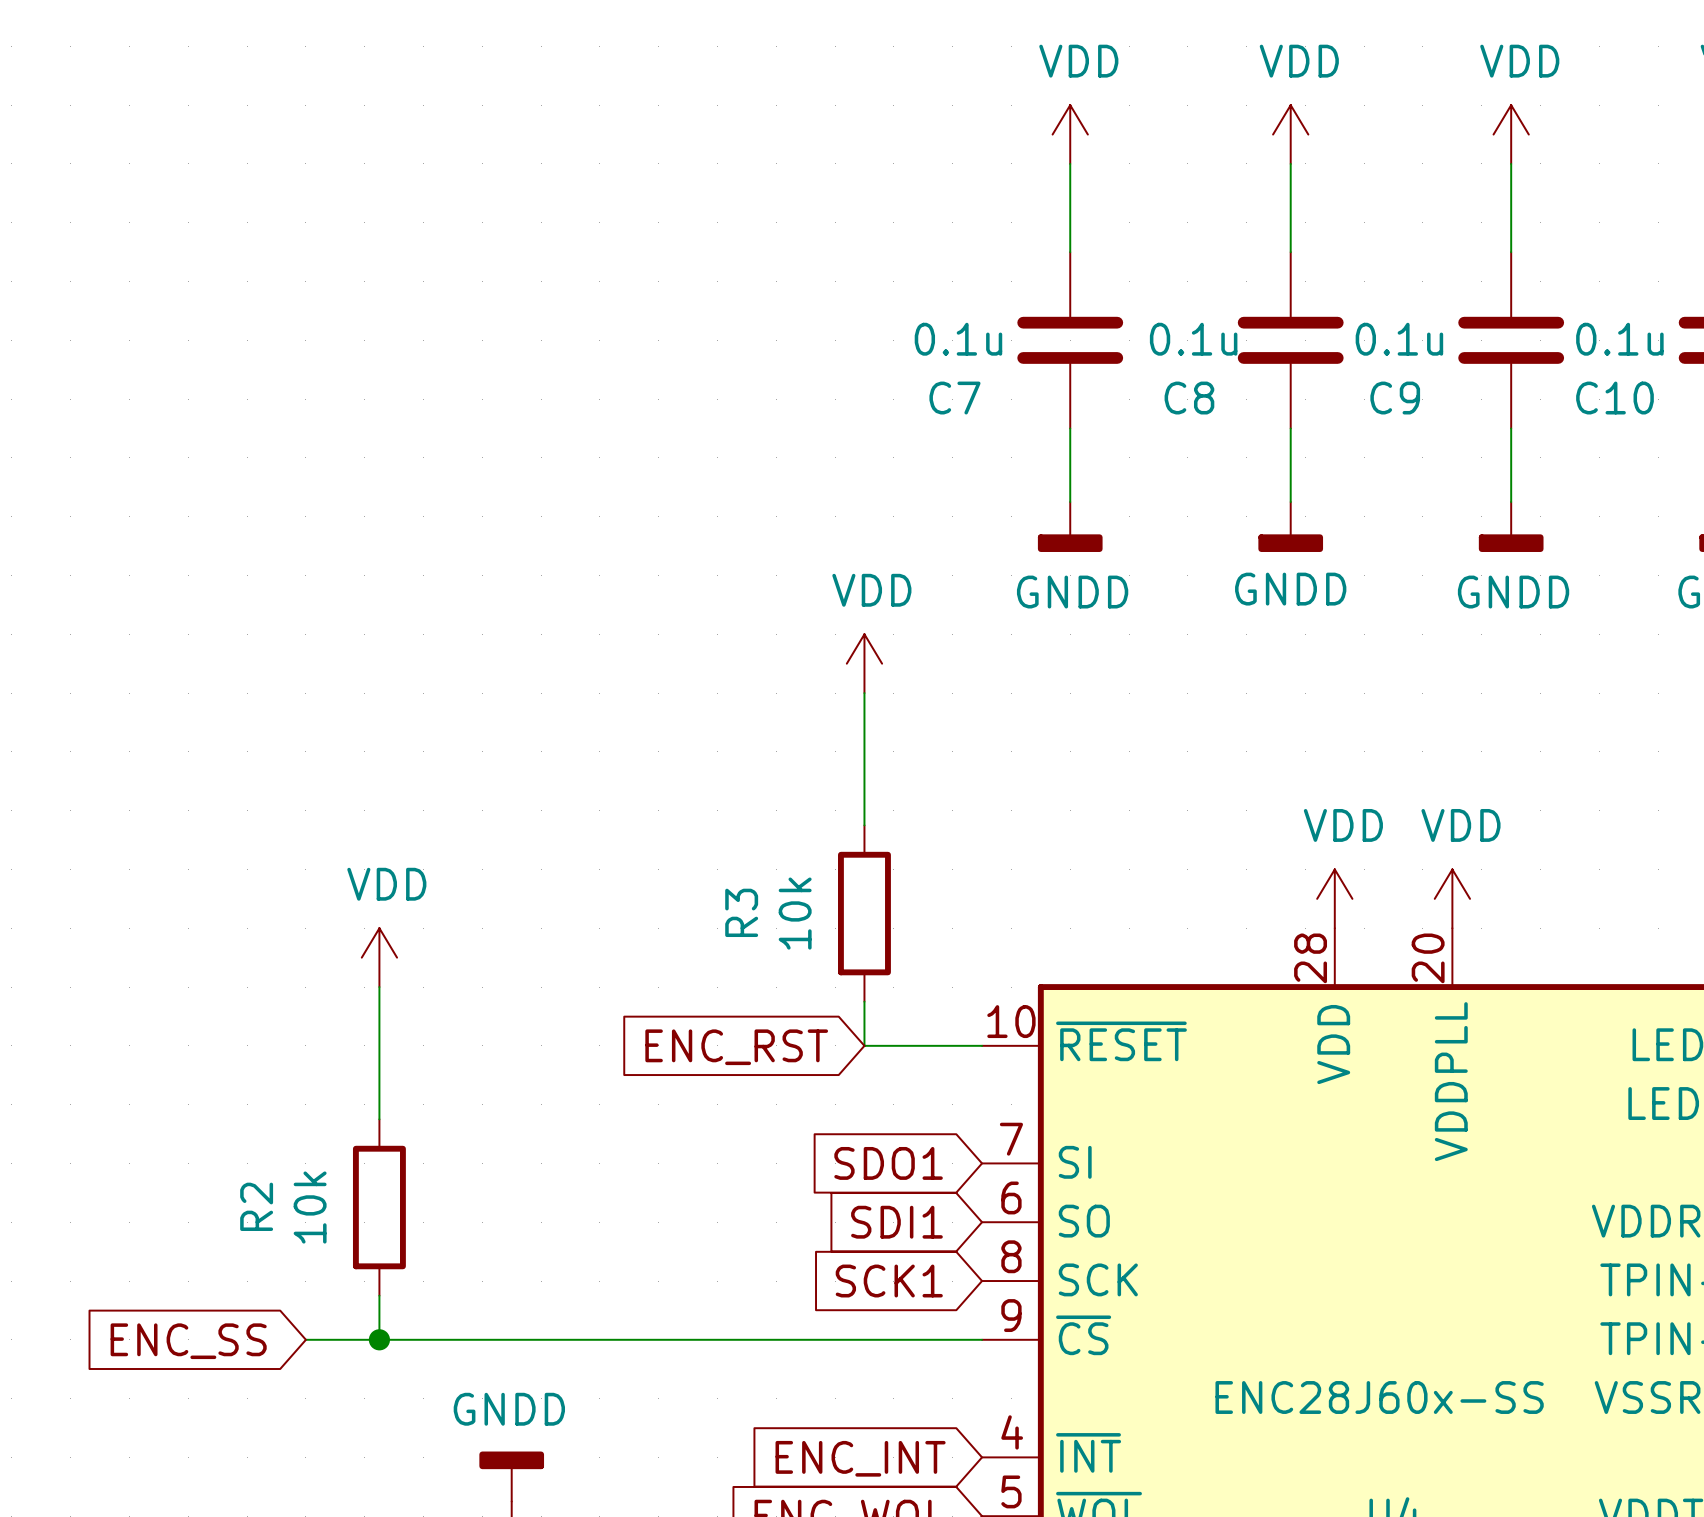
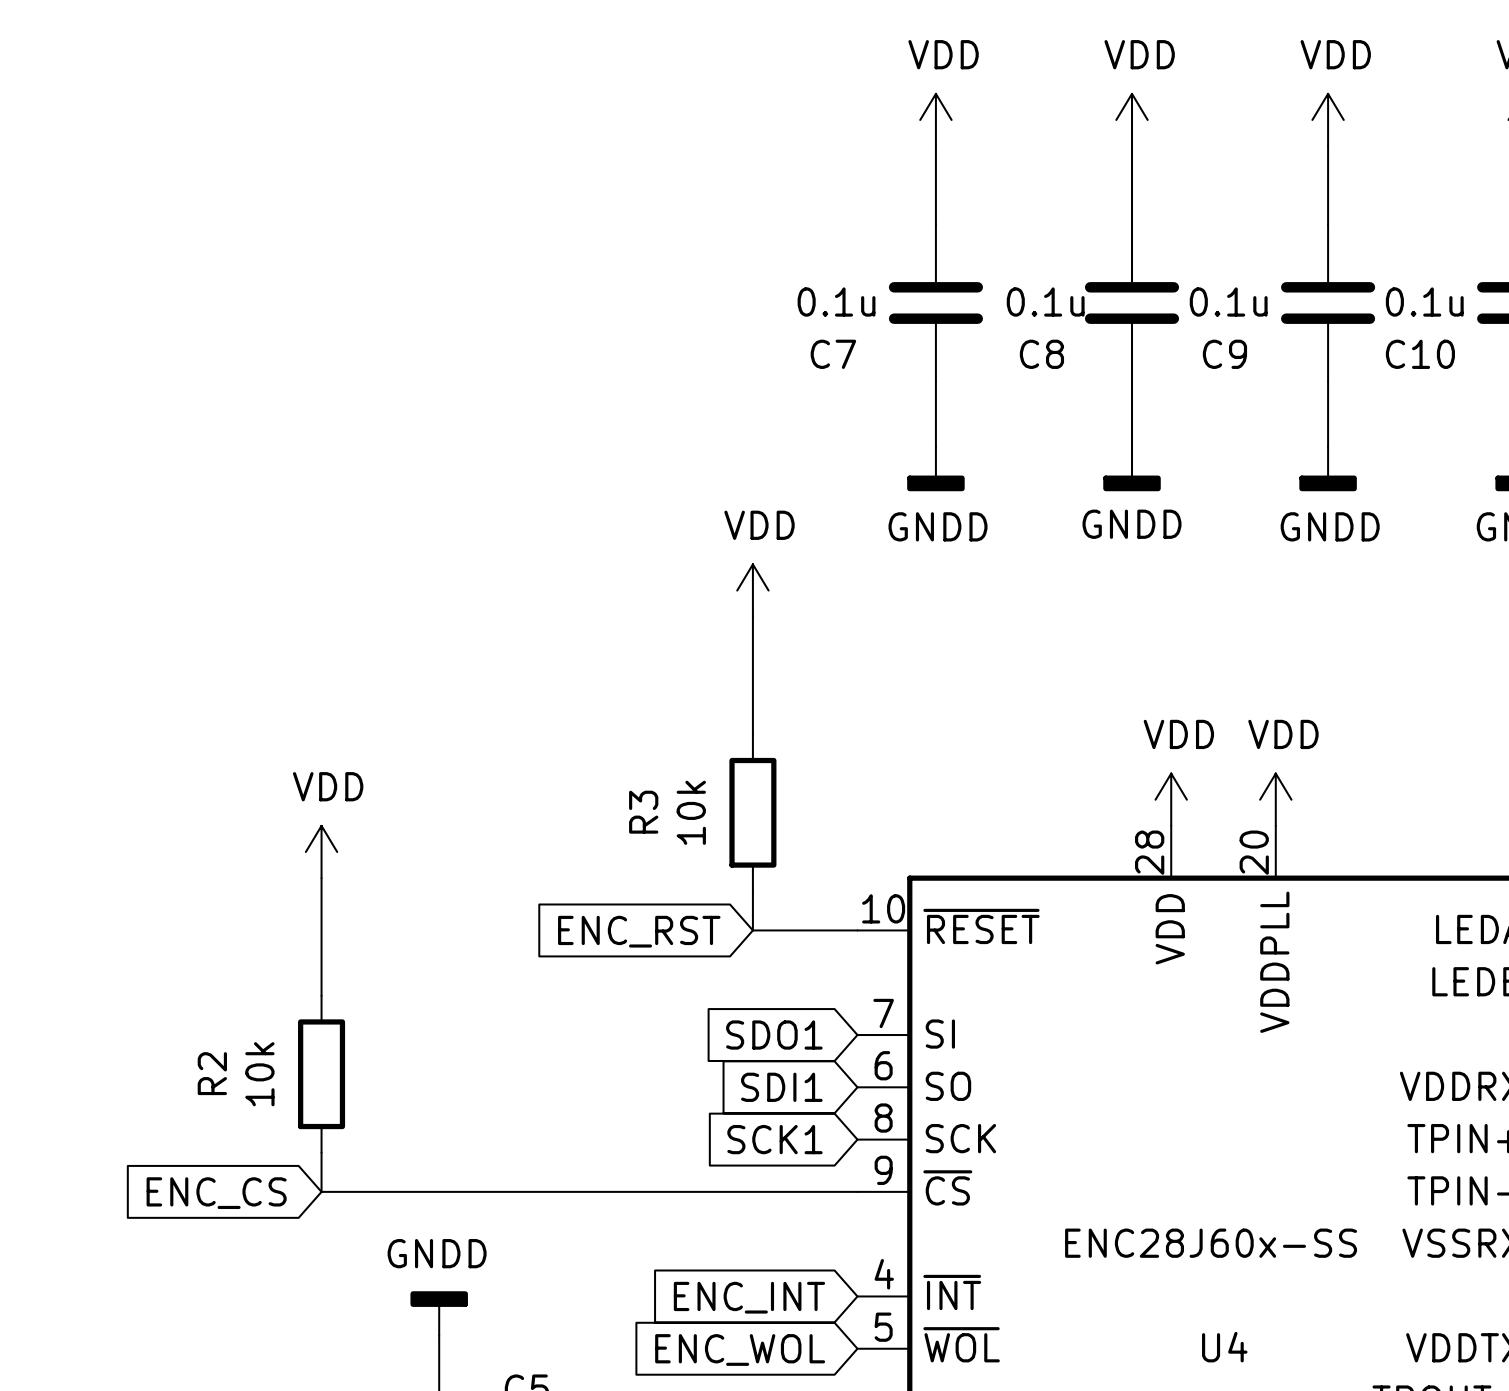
wire: (305, 1339) (379, 1339) -> none
junction: (379, 1339) -> none
global label: ENC_SS (188, 1341) -> ENC_CS (216, 1193)

